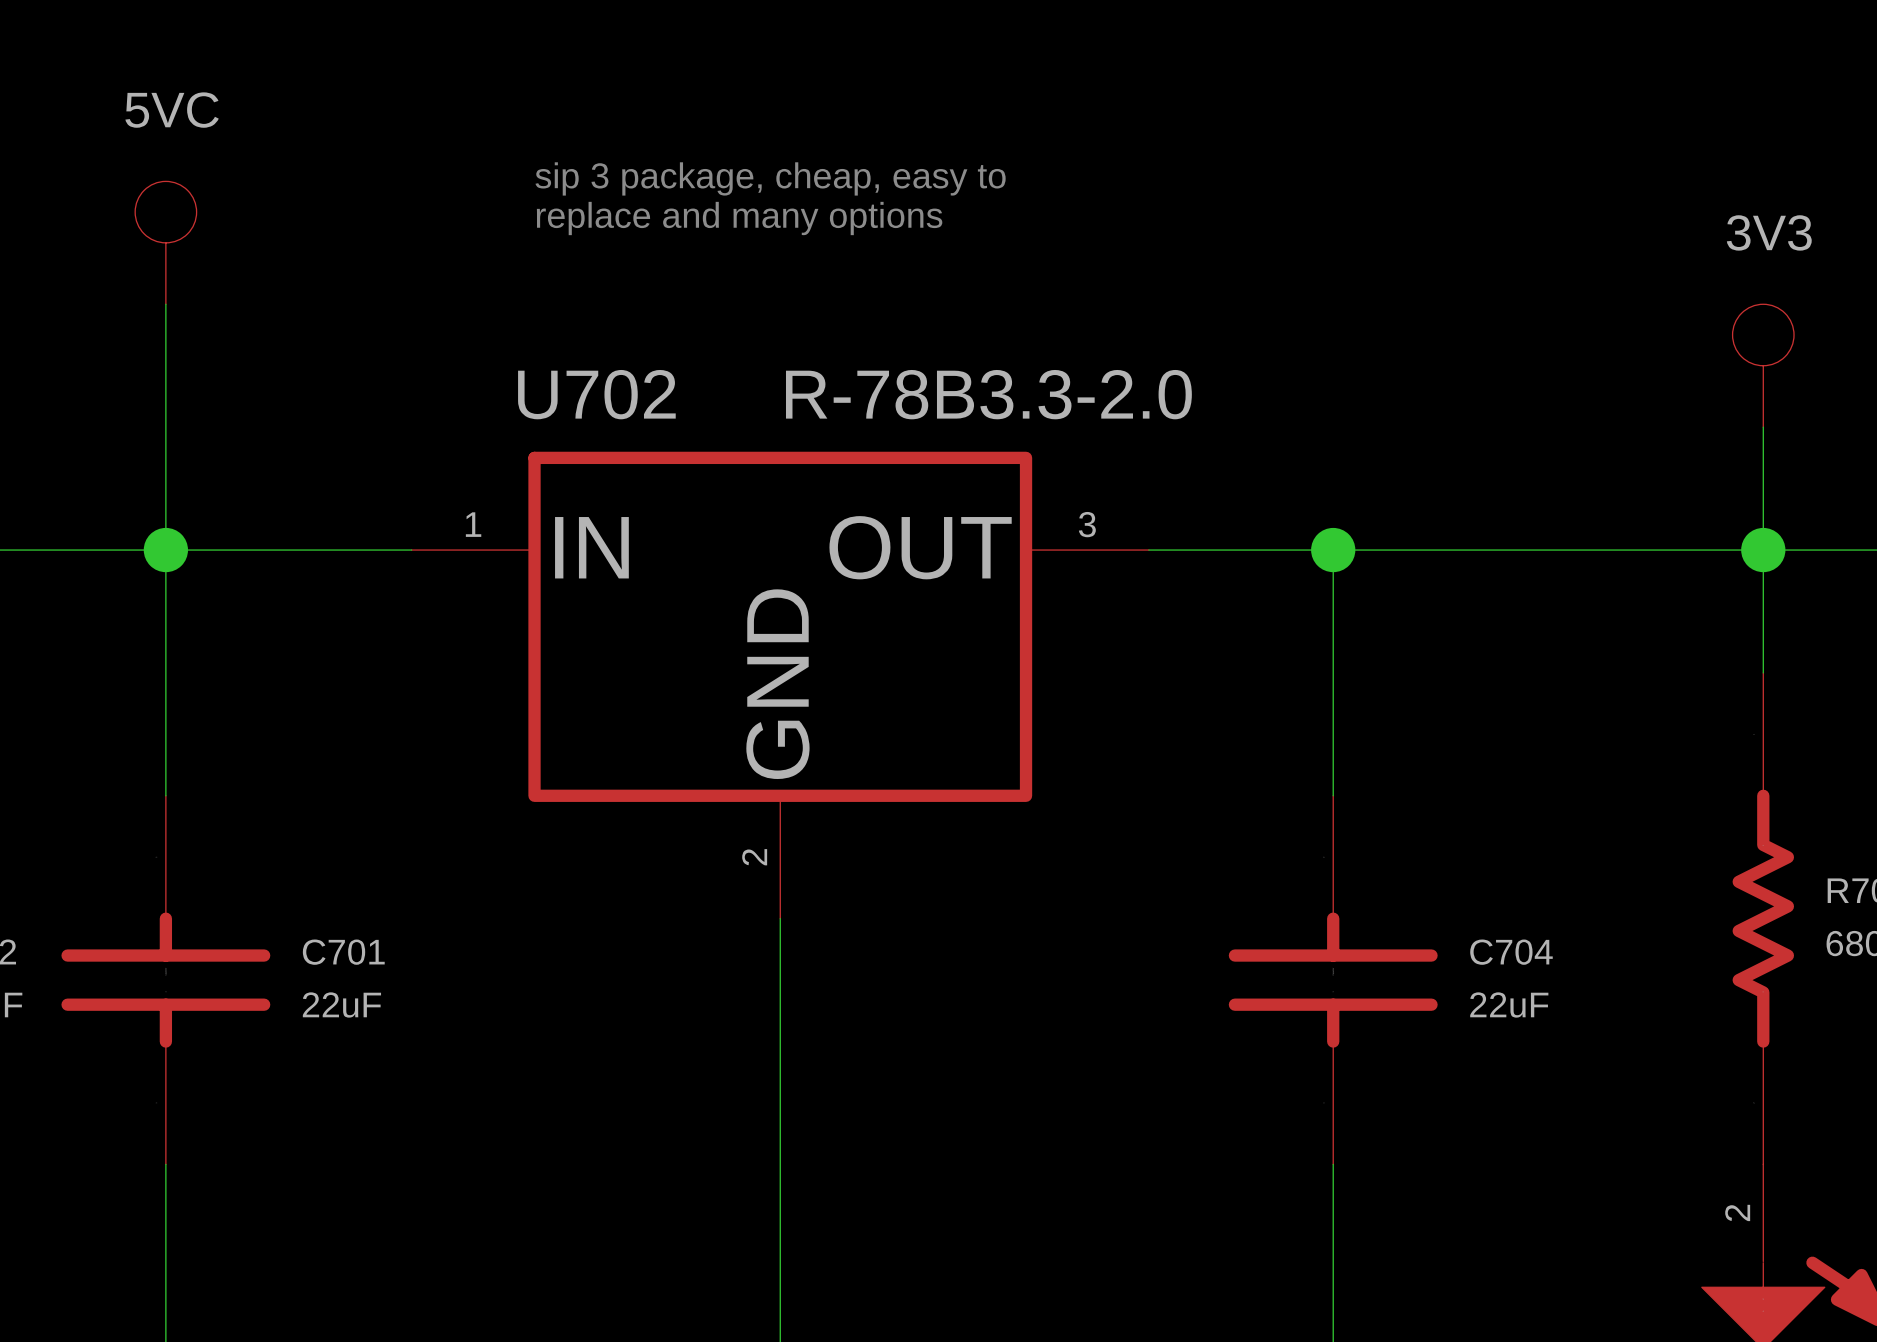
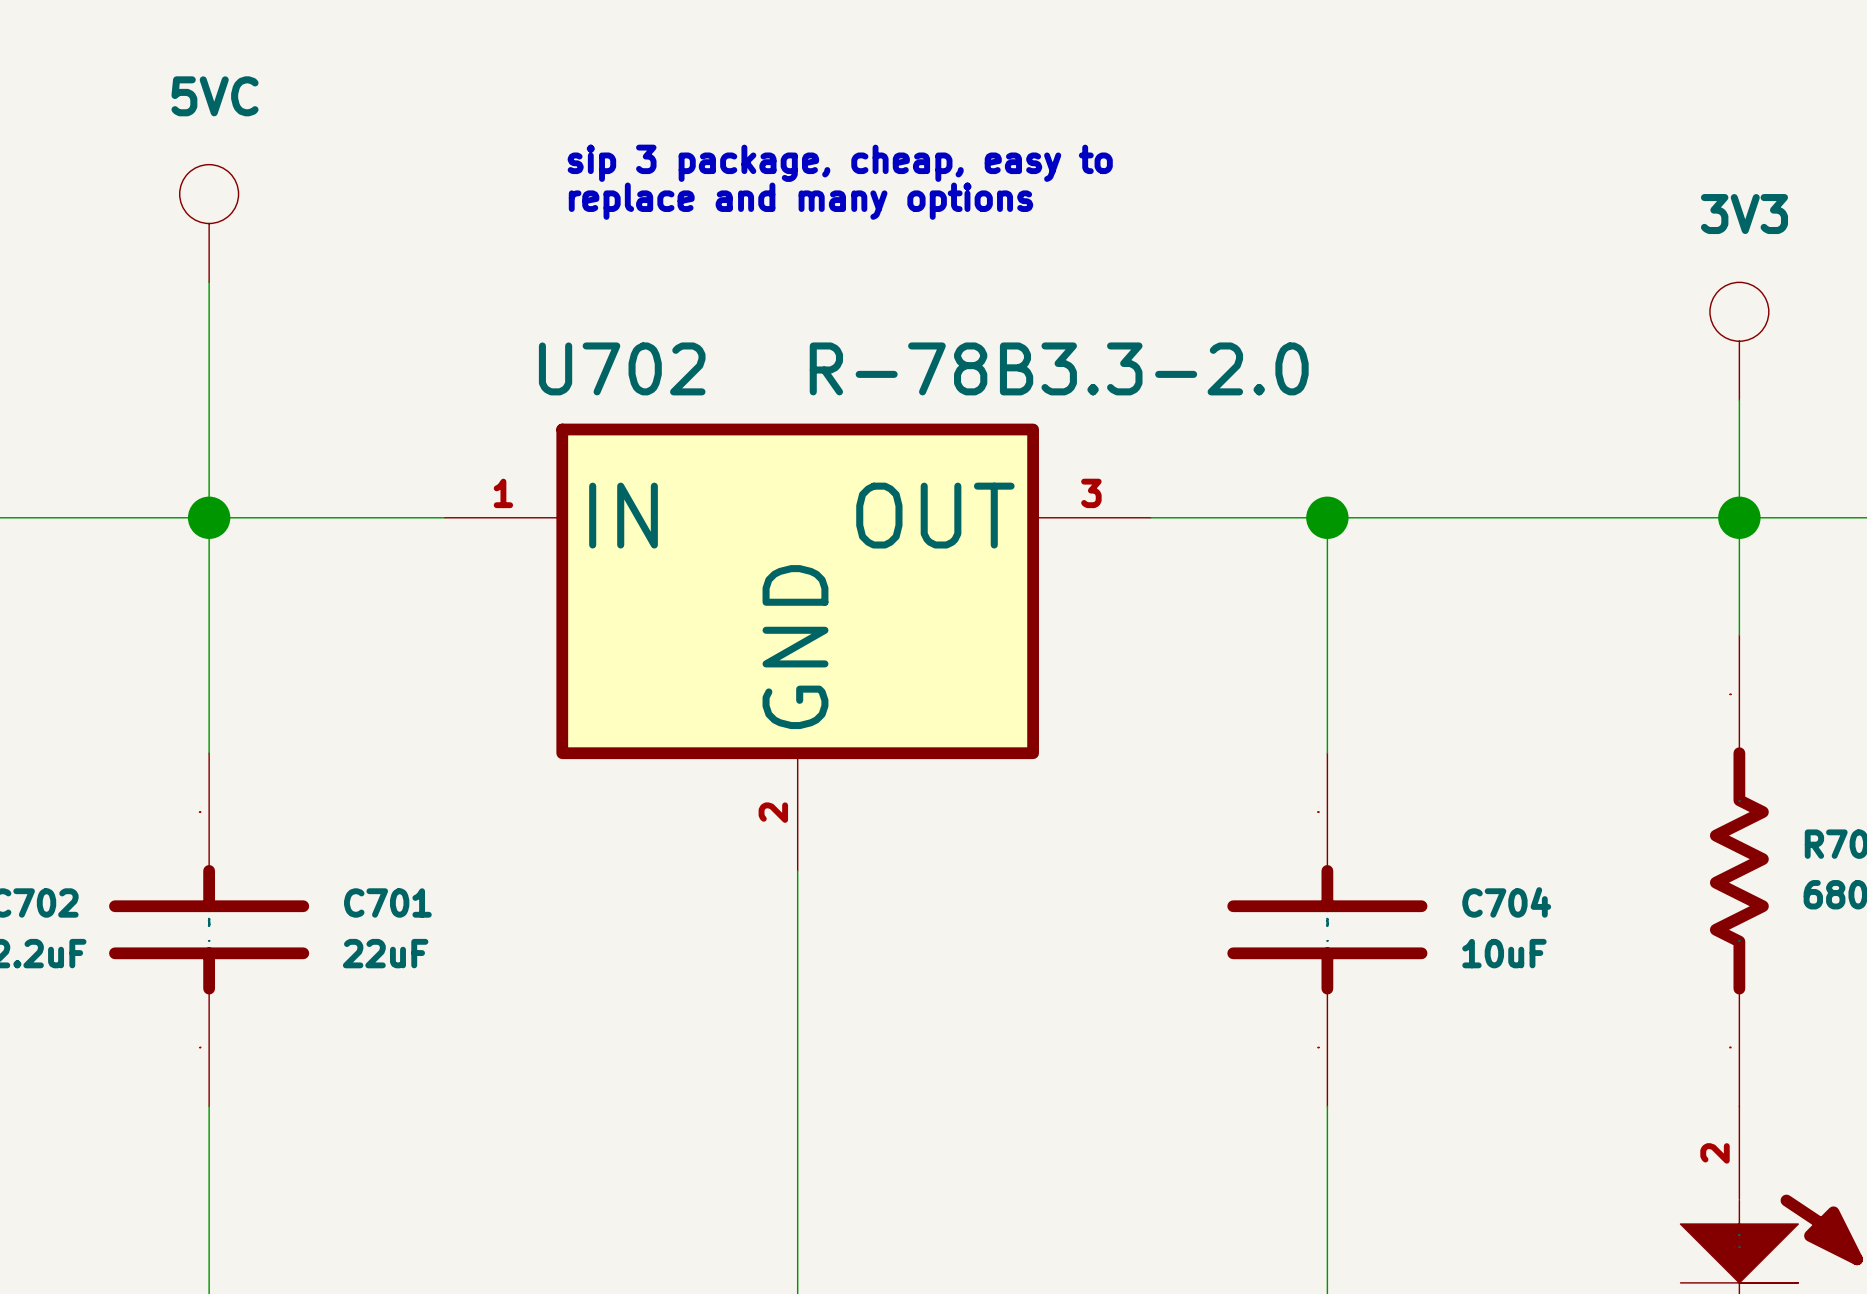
C704 value: 22uF (1509, 1004) -> 10uF (1504, 953)

